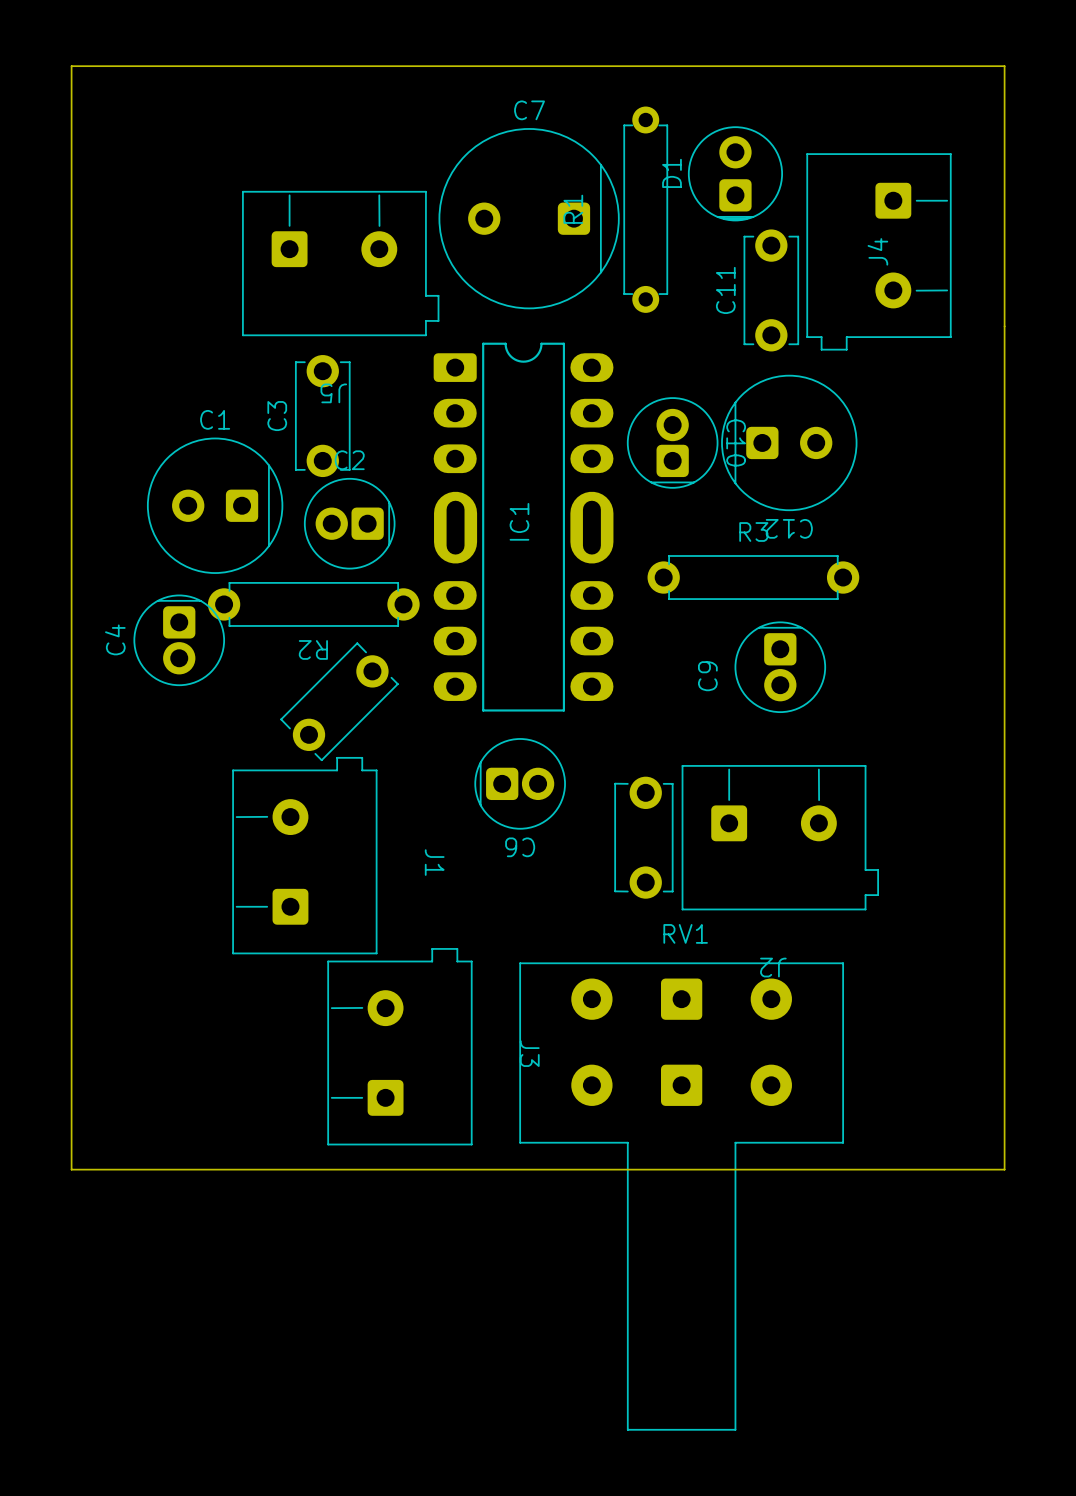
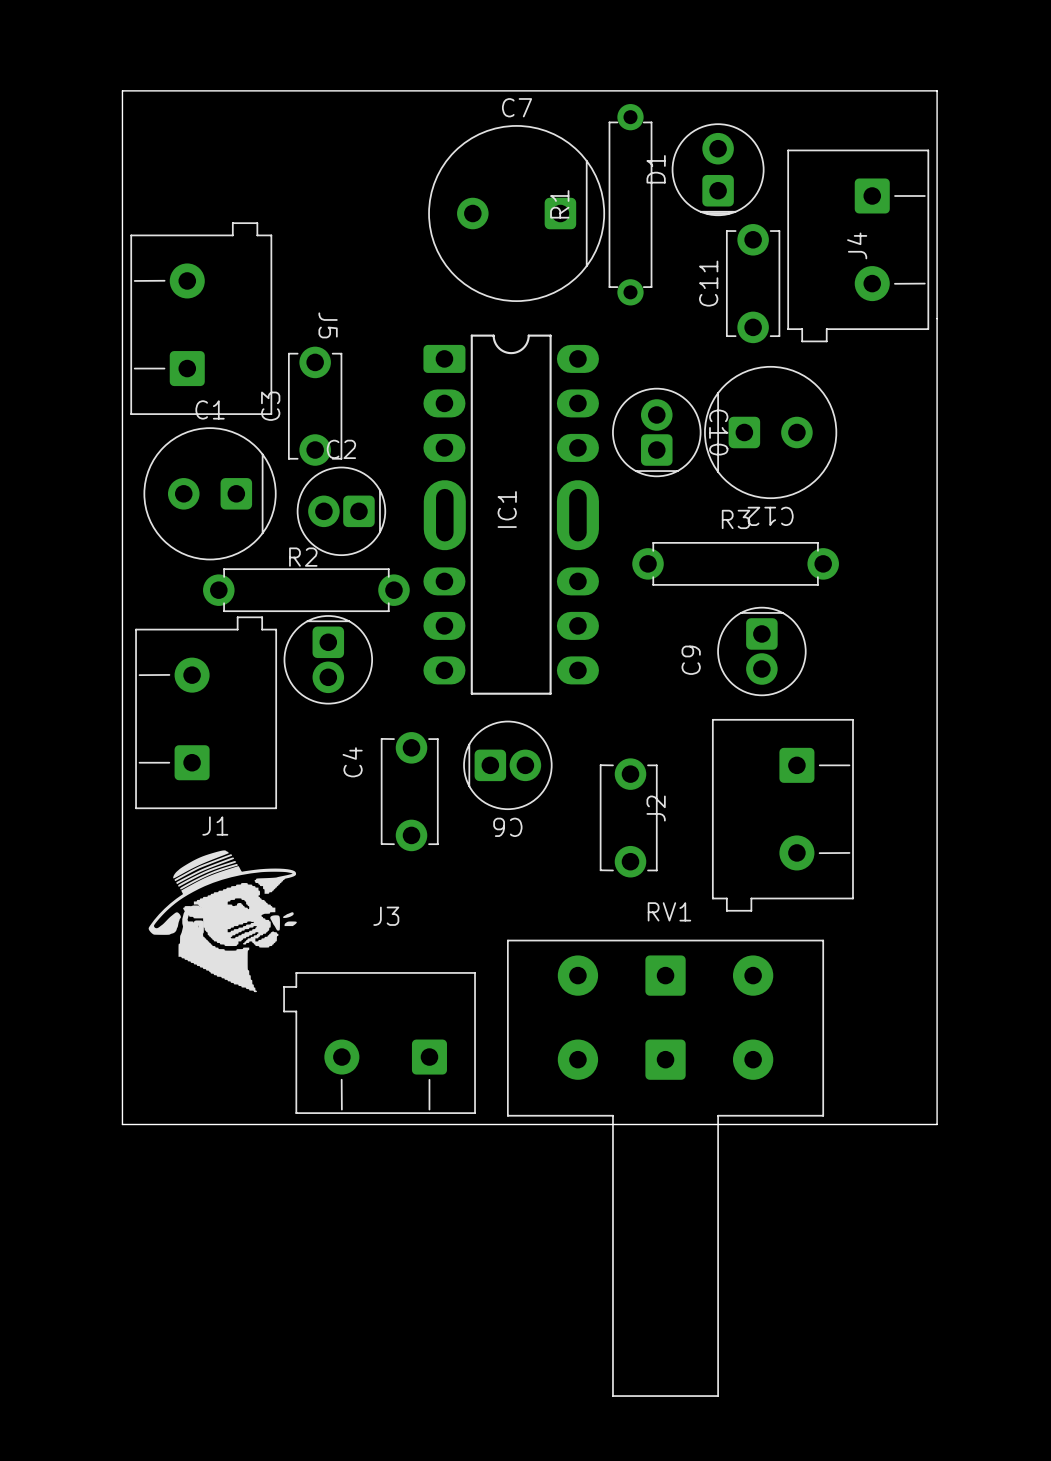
board edge: (71, 66) (1004, 66) (1004, 1169) (71, 1169) (71, 66) -> (122, 90) (122, 1124) (937, 1124) (937, 90) (122, 90)
J5 rotation: 0° (340, 263) -> 90° counterclockwise (201, 318)
J5 position: (340, 263) -> (201, 318)
C4 name position: C4 (115, 639) -> C4 (352, 762)
C4 position: (179, 640) -> (328, 659)
R2 name rotation: 0° (313, 649) -> 180° (303, 557)
R2 name position: R2 (313, 649) -> R2 (303, 557)
part: (339, 701) -> none
part: none -> (409, 791)
J2 rotation: 0° (780, 837) -> 90° clockwise (782, 815)
J1 position: (304, 855) -> (206, 712)
J1 name rotation: 0° (434, 862) -> 90° counterclockwise (215, 826)
J1 name position: J1 (434, 862) -> J1 (215, 826)
part: none -> (222, 921)
J3 rotation: 0° (399, 1046) -> 90° counterclockwise (379, 1043)

